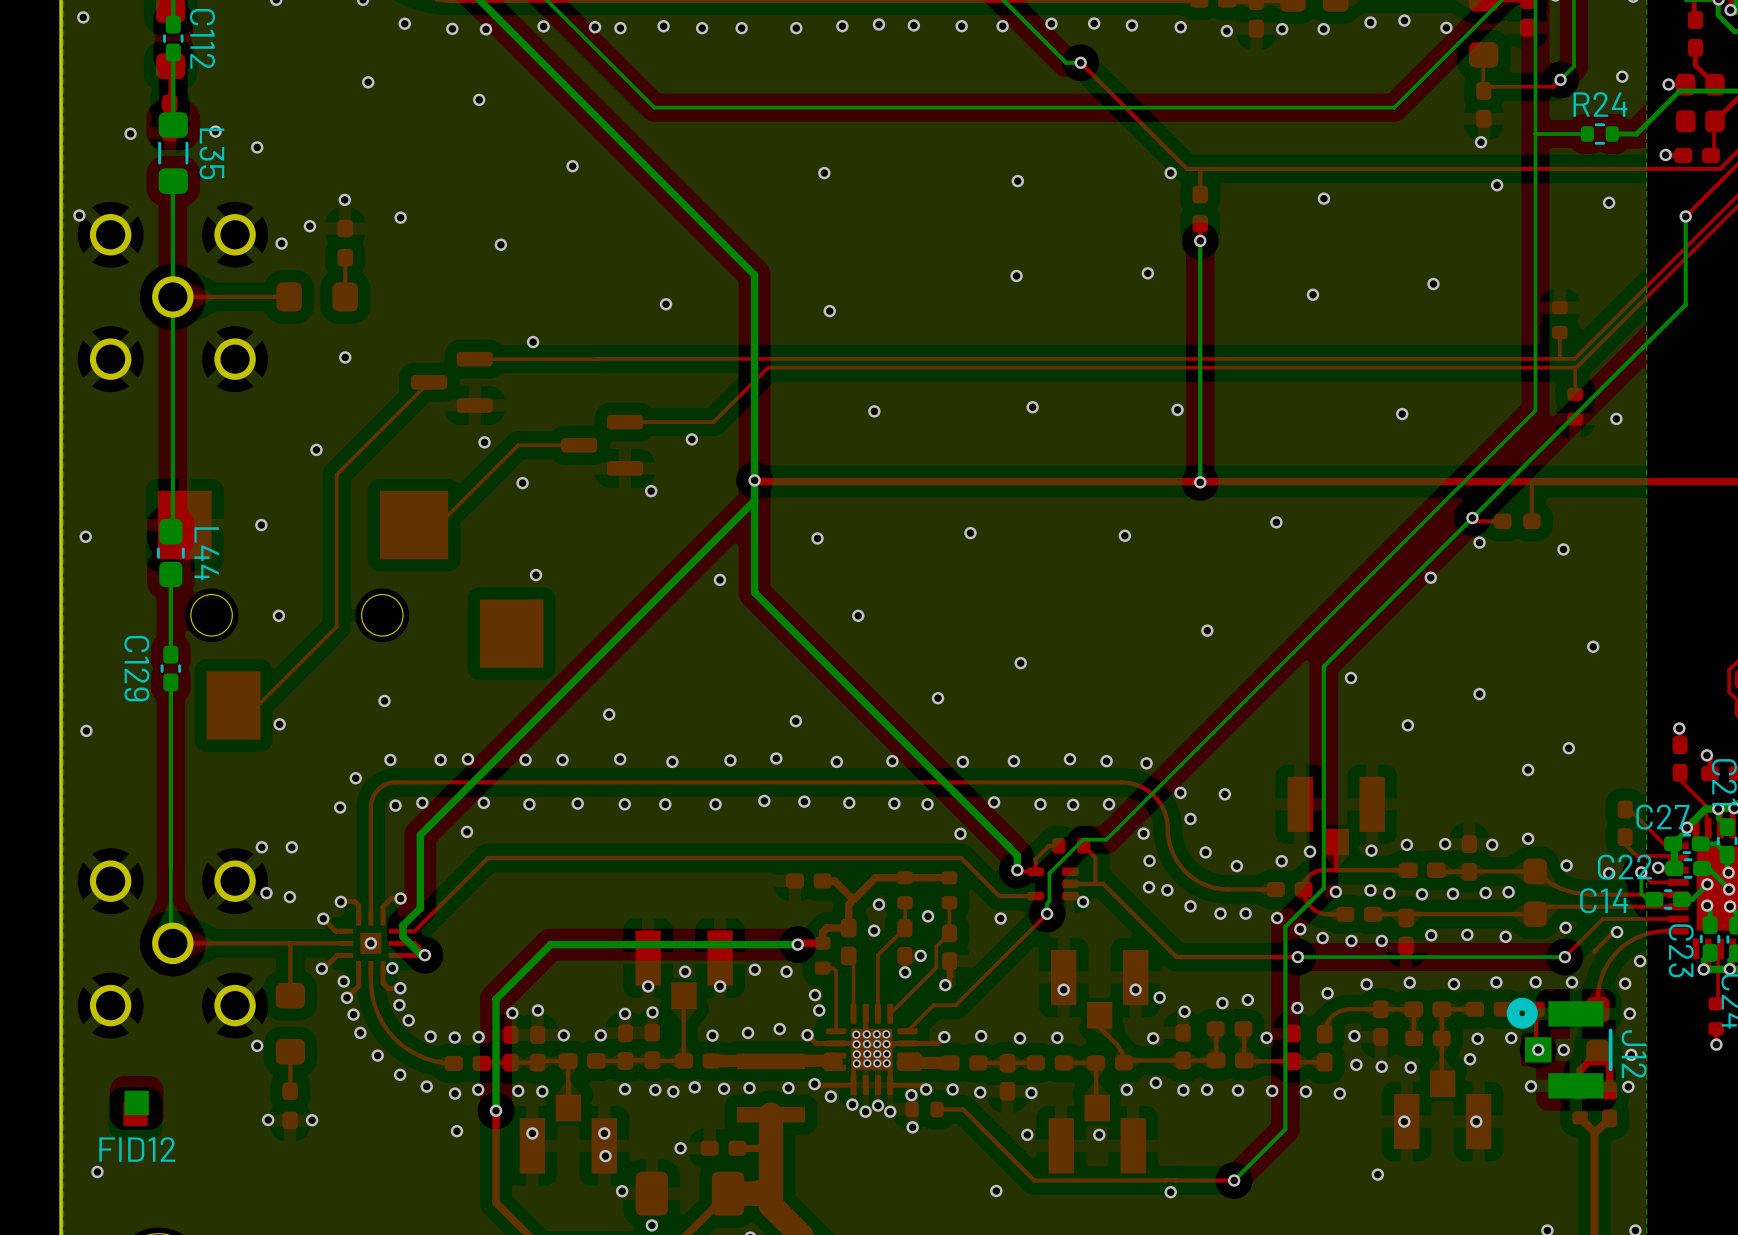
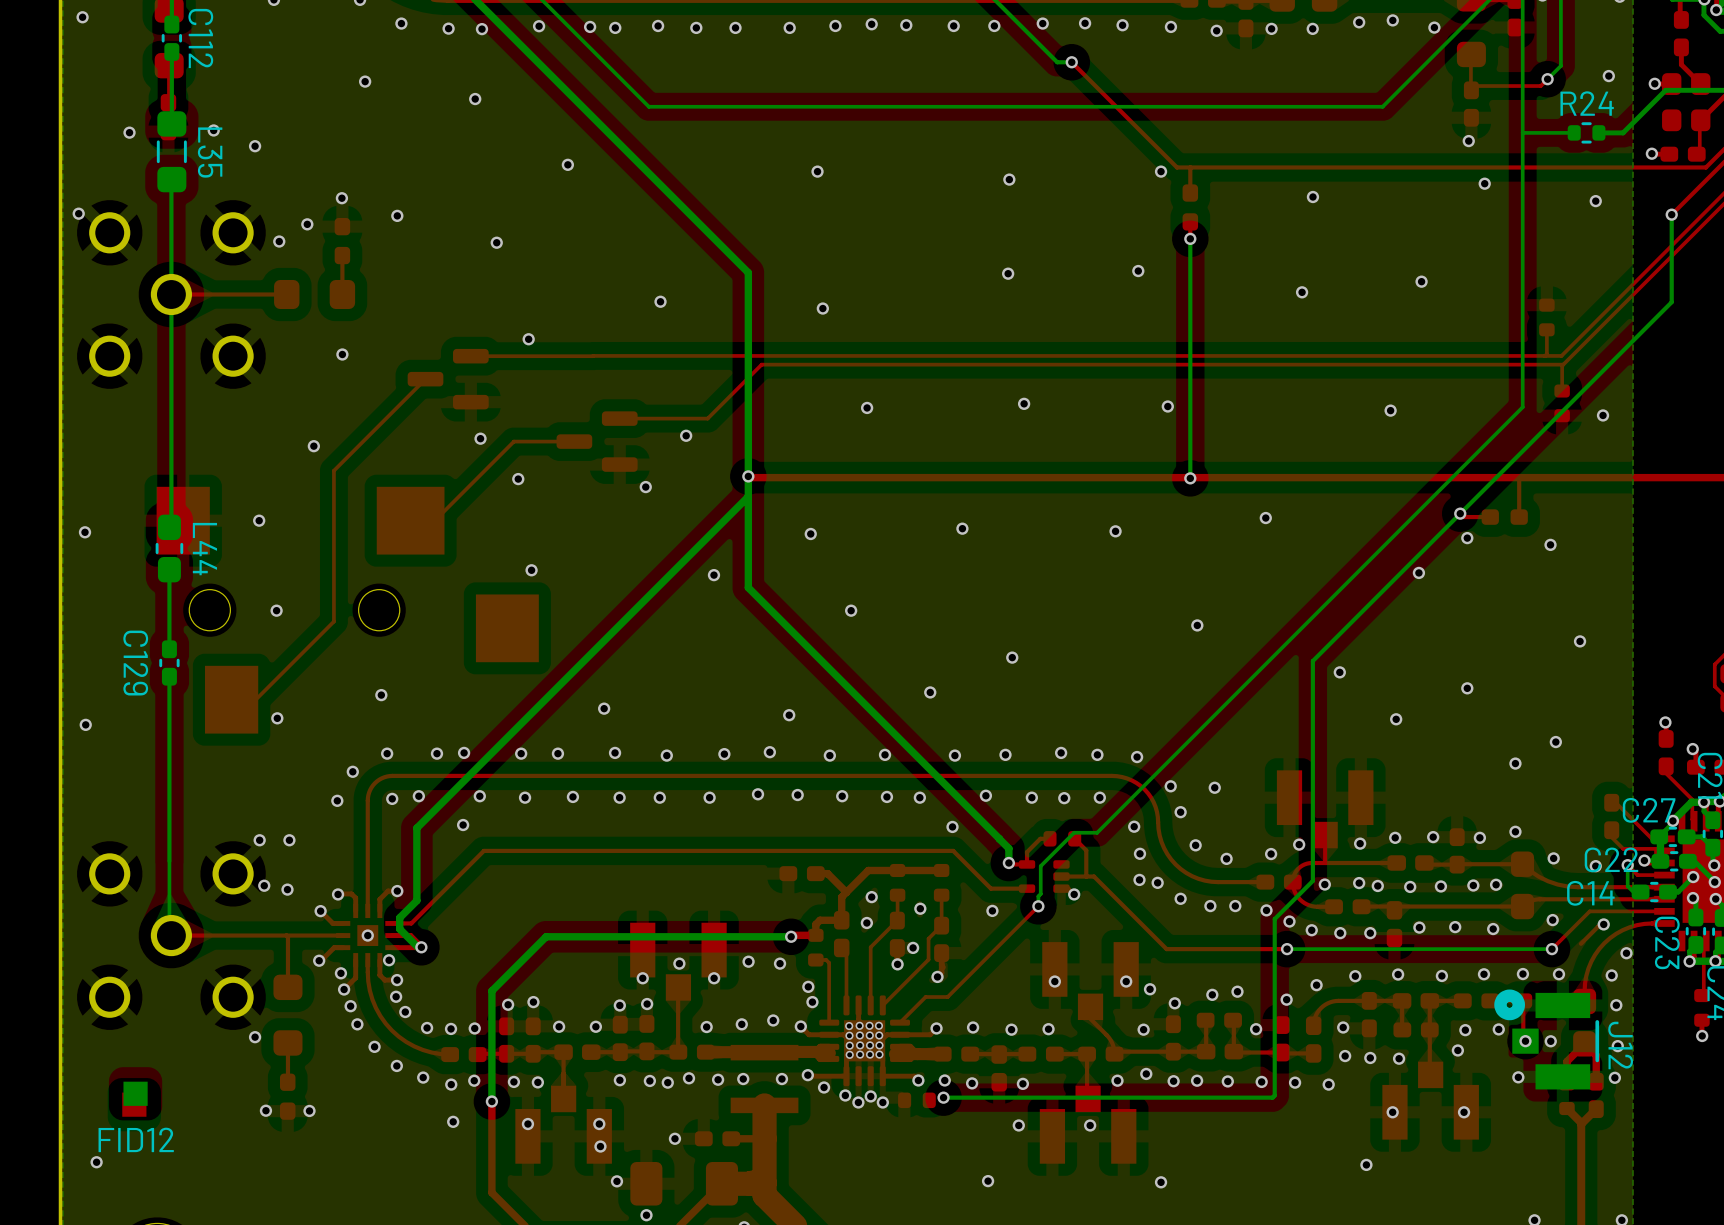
via: (911, 1095) -> none
bottom track: (1285, 1104) (1285, 1129) (1234, 1180) -> (1274, 1095) (1272, 1097) (943, 1097)
via: none -> (943, 1097)
top track: (937, 1109) (963, 1109) (1034, 1180) (1165, 1180) -> none
via: (912, 1127) -> none
top track: (1175, 1180) (1165, 1180) -> none
top track: (1234, 1180) (1176, 1180) -> none
via: (1234, 1180) -> none

